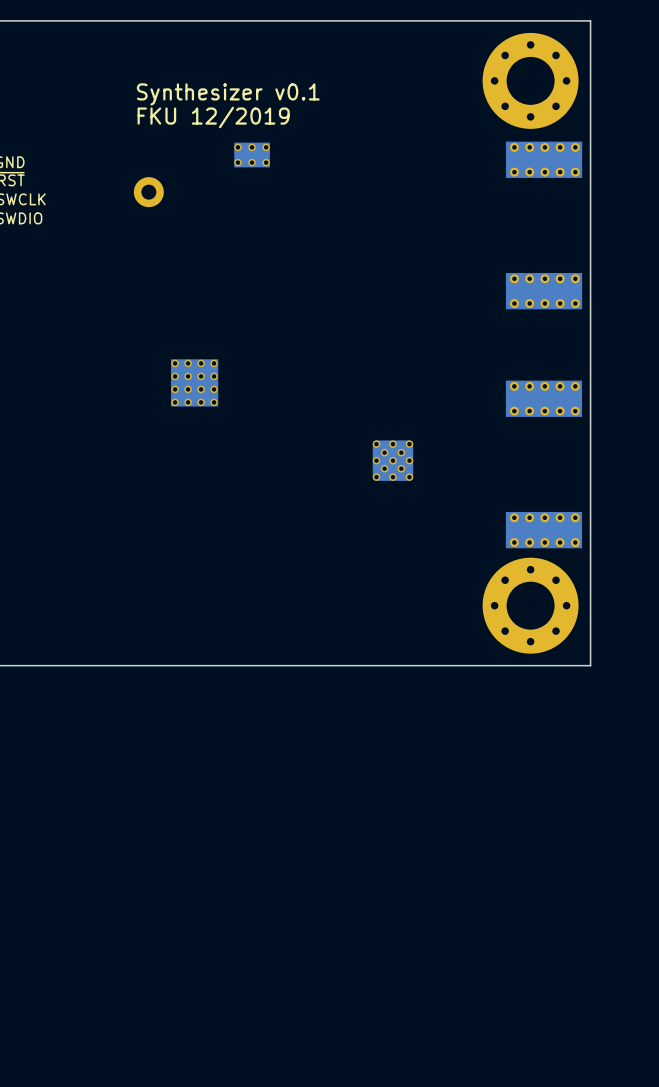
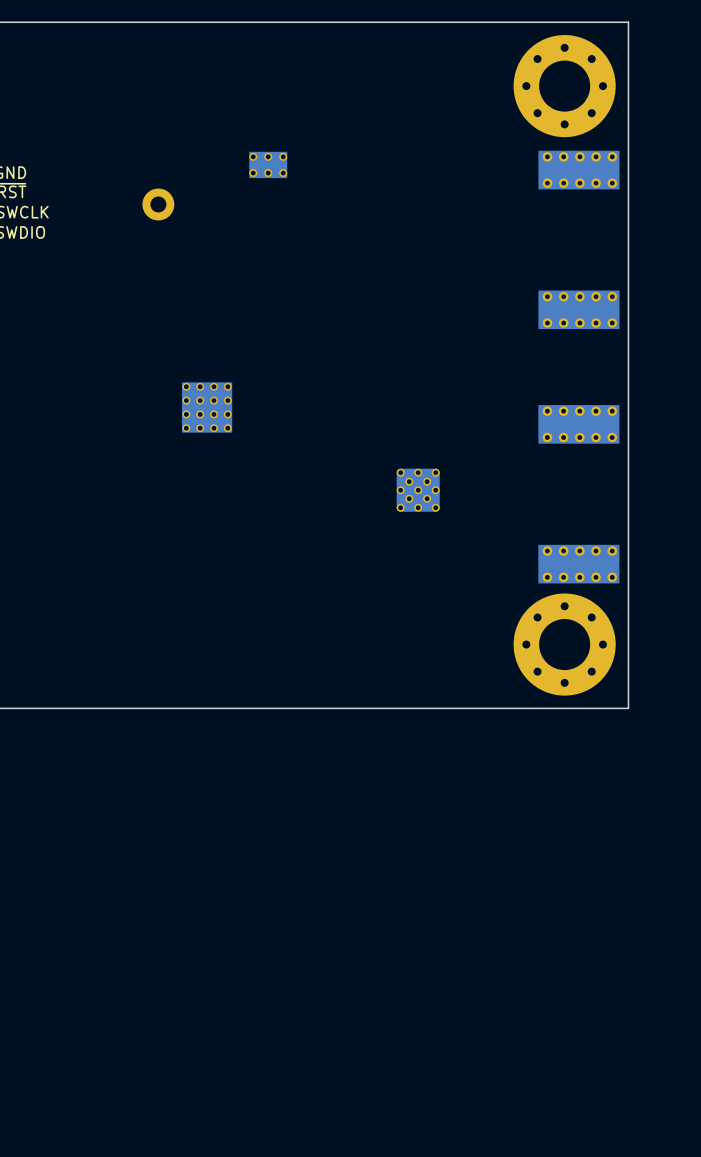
text: Synthesizer v0.1 (228, 94) -> none
text: FKU 12/2019 (213, 117) -> none

